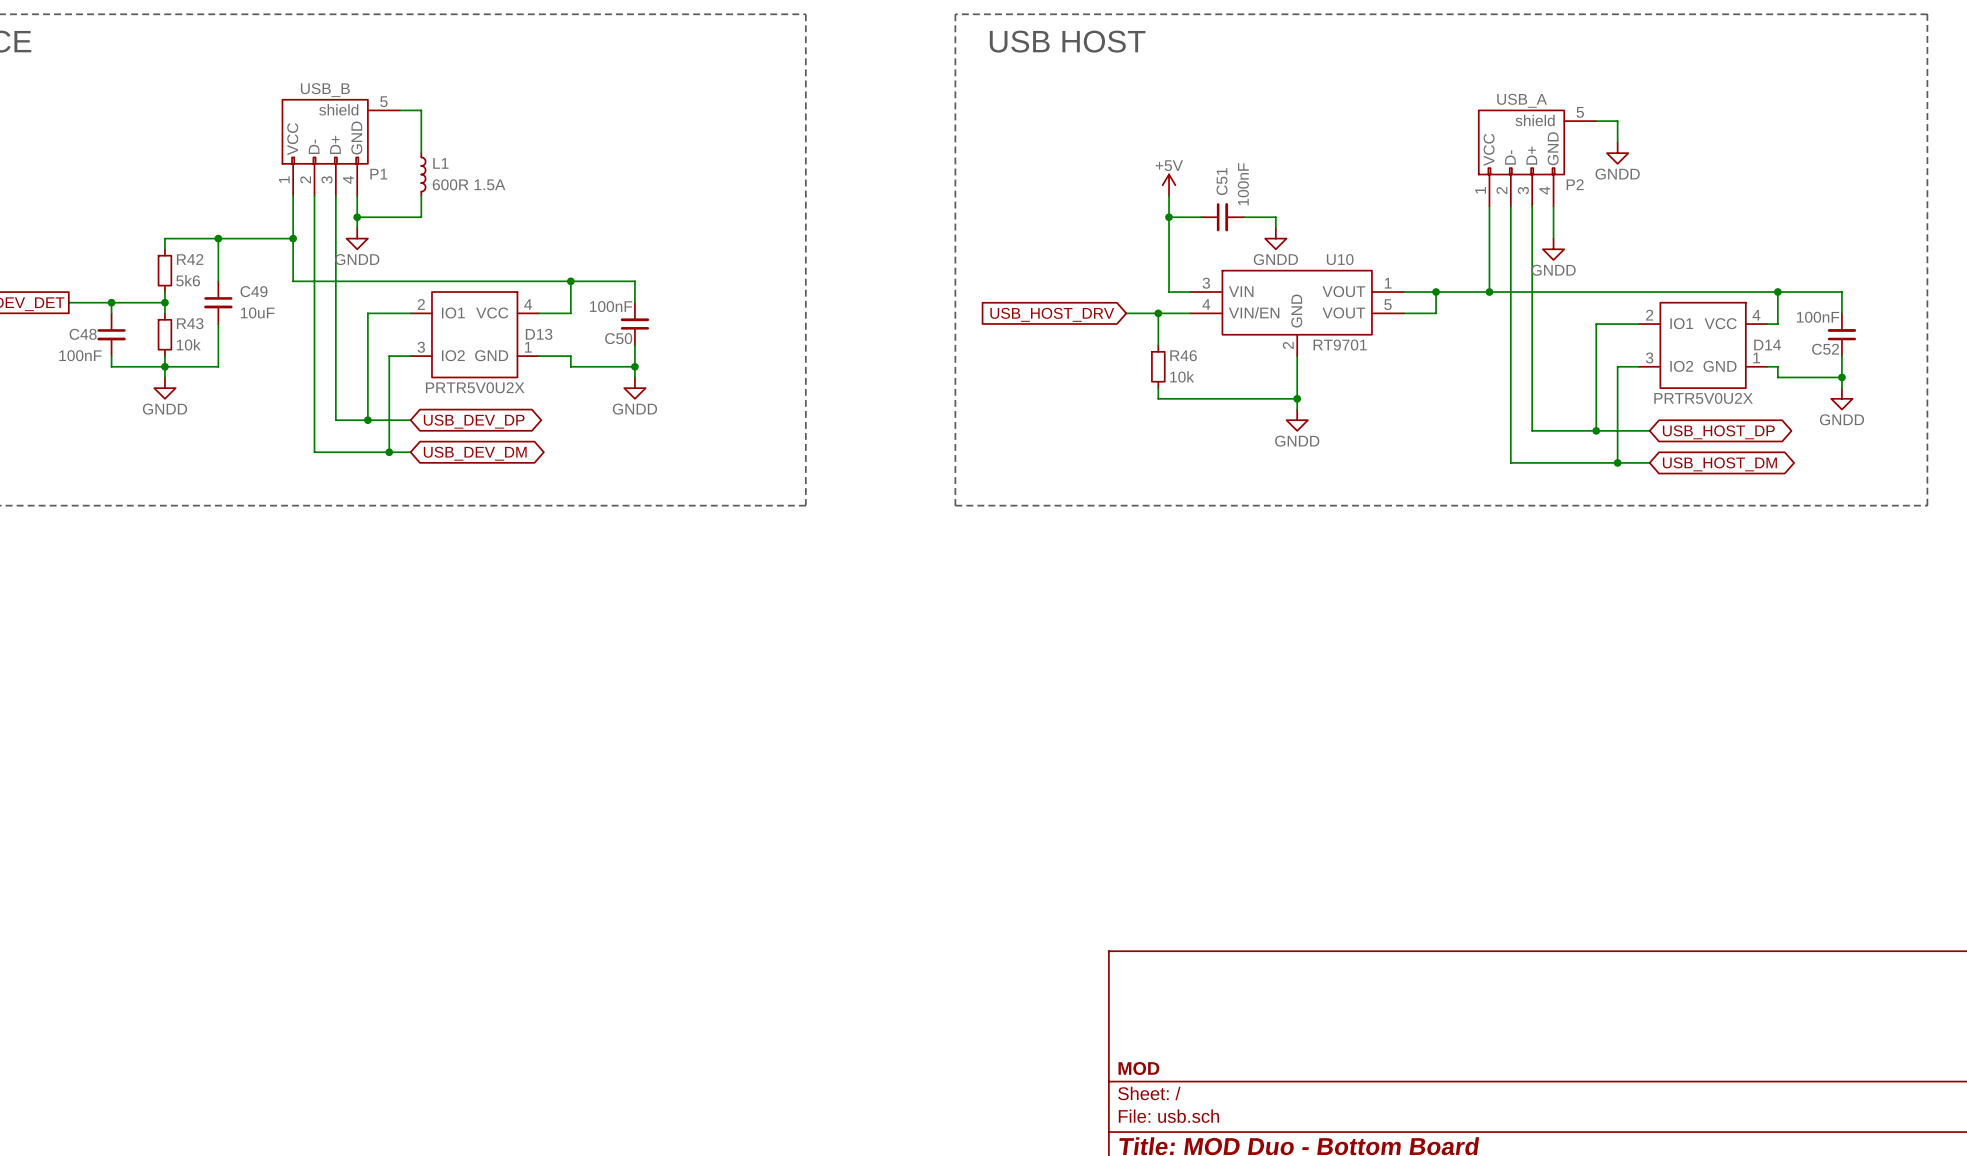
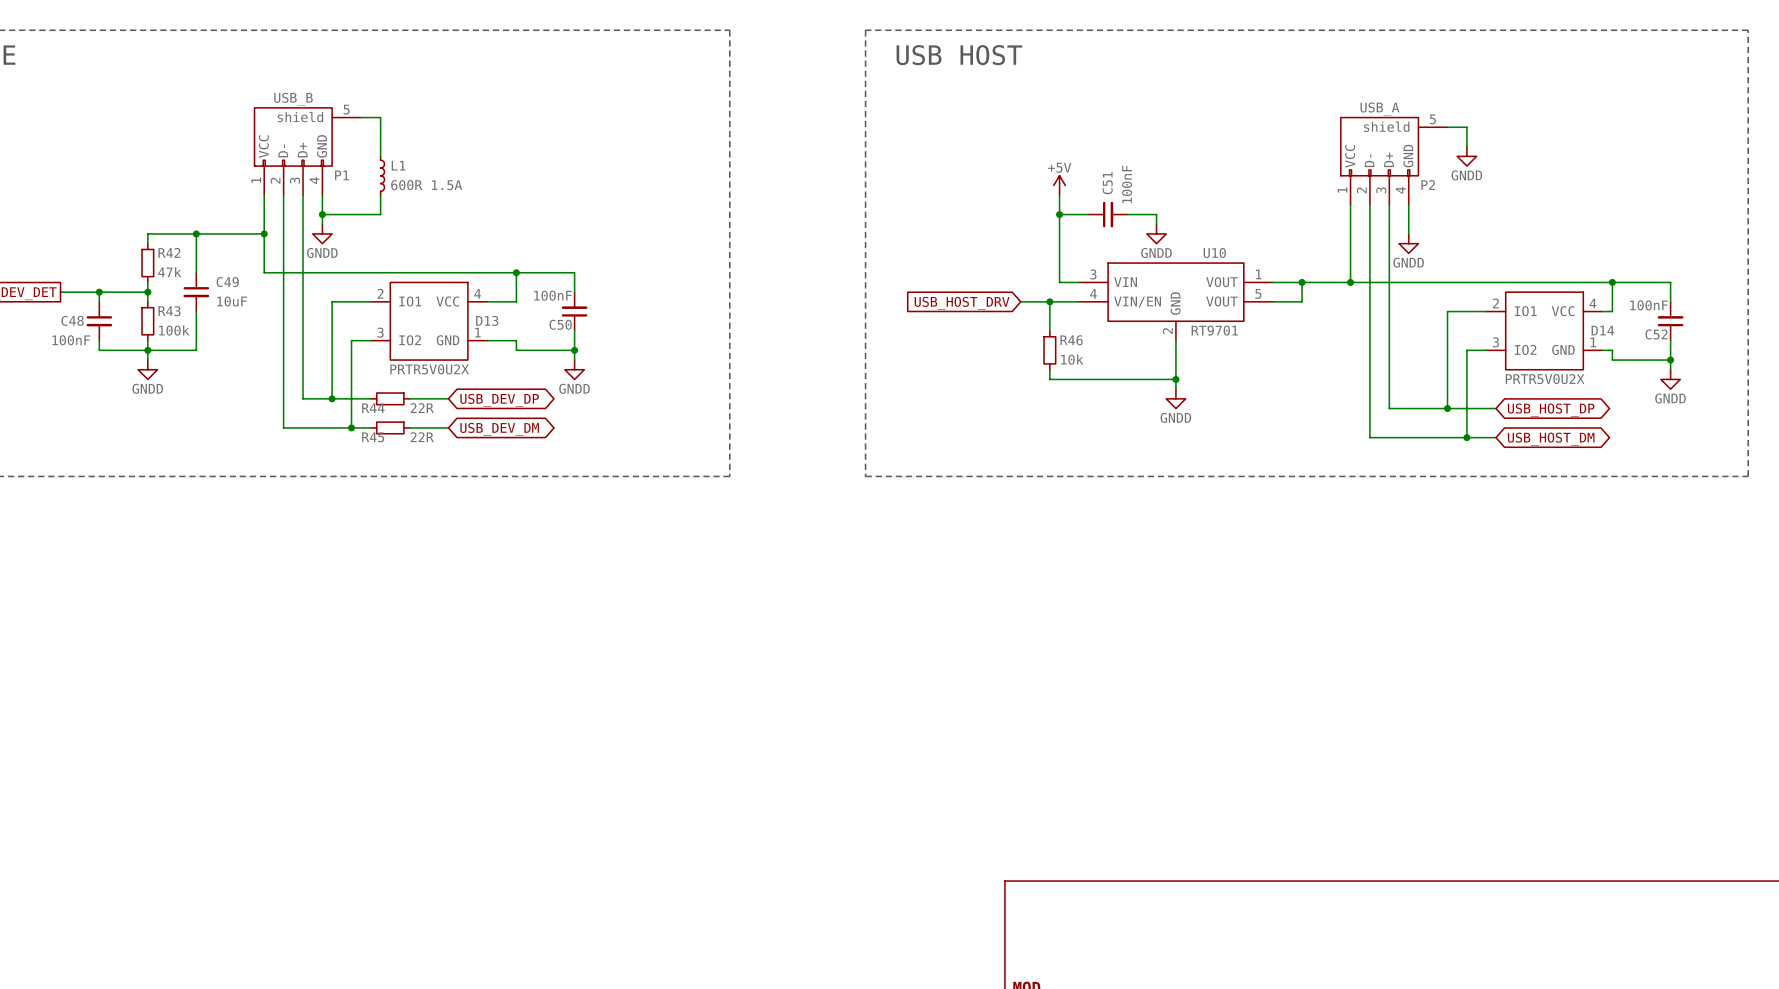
R42 value: 5k6 (188, 280) -> 47k (169, 272)
R43 value: 10k (188, 344) -> 100k (174, 330)
R44: none -> 22R (390, 398)
wire: none -> (409, 398) (448, 398)
global label position: USB_DEV_DP (474, 421) -> USB_DEV_DP (499, 400)
R45: none -> 22R (390, 427)
wire: none -> (409, 427) (448, 427)
global label position: USB_DEV_DM (475, 453) -> USB_DEV_DM (499, 429)

